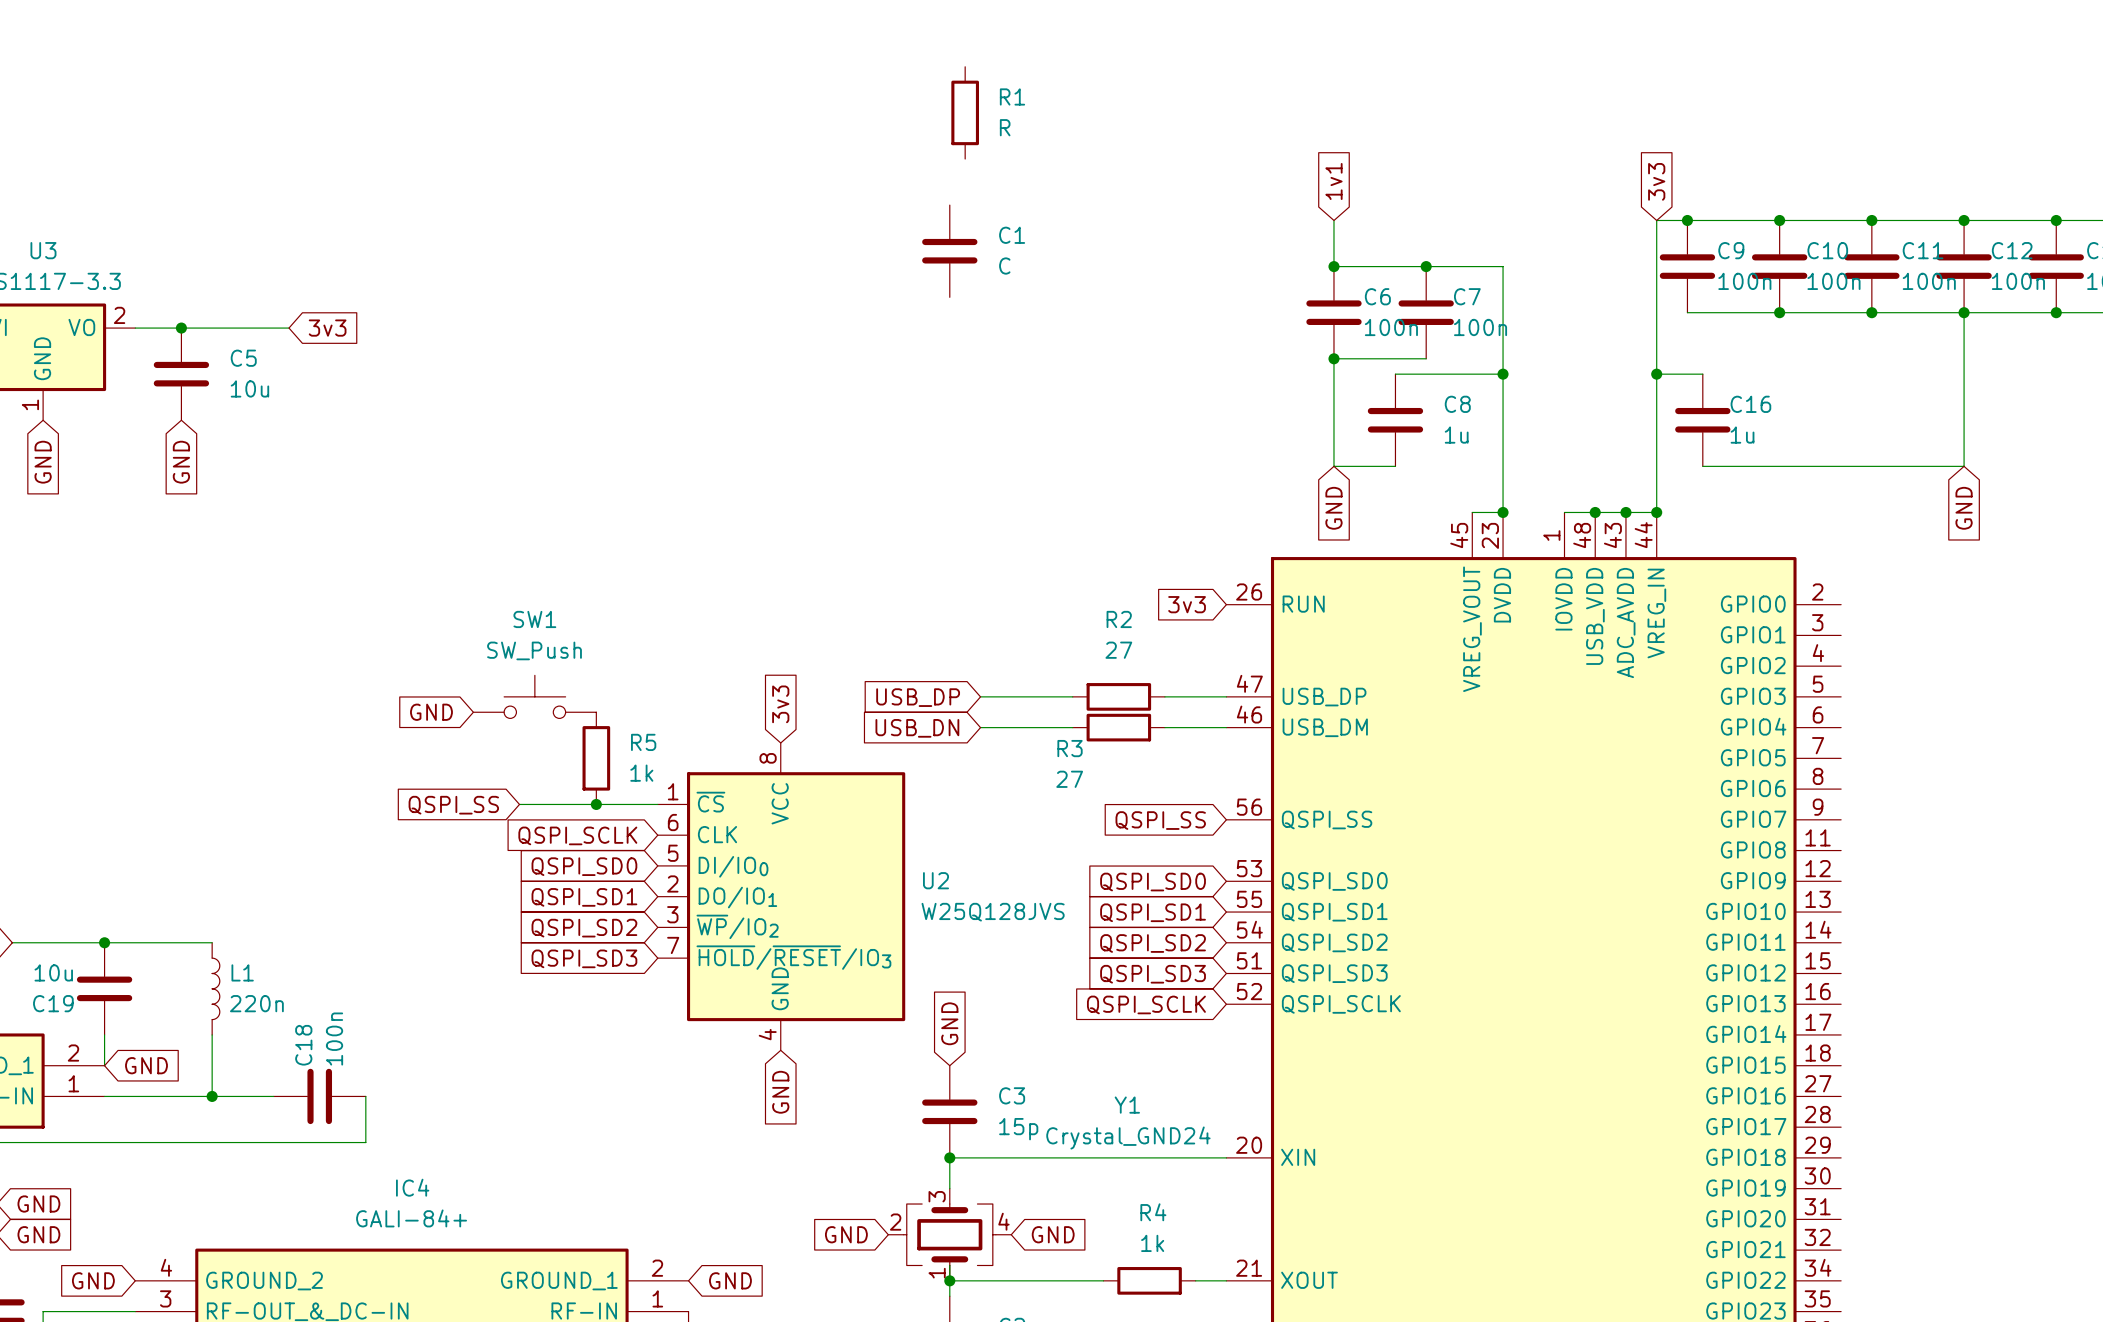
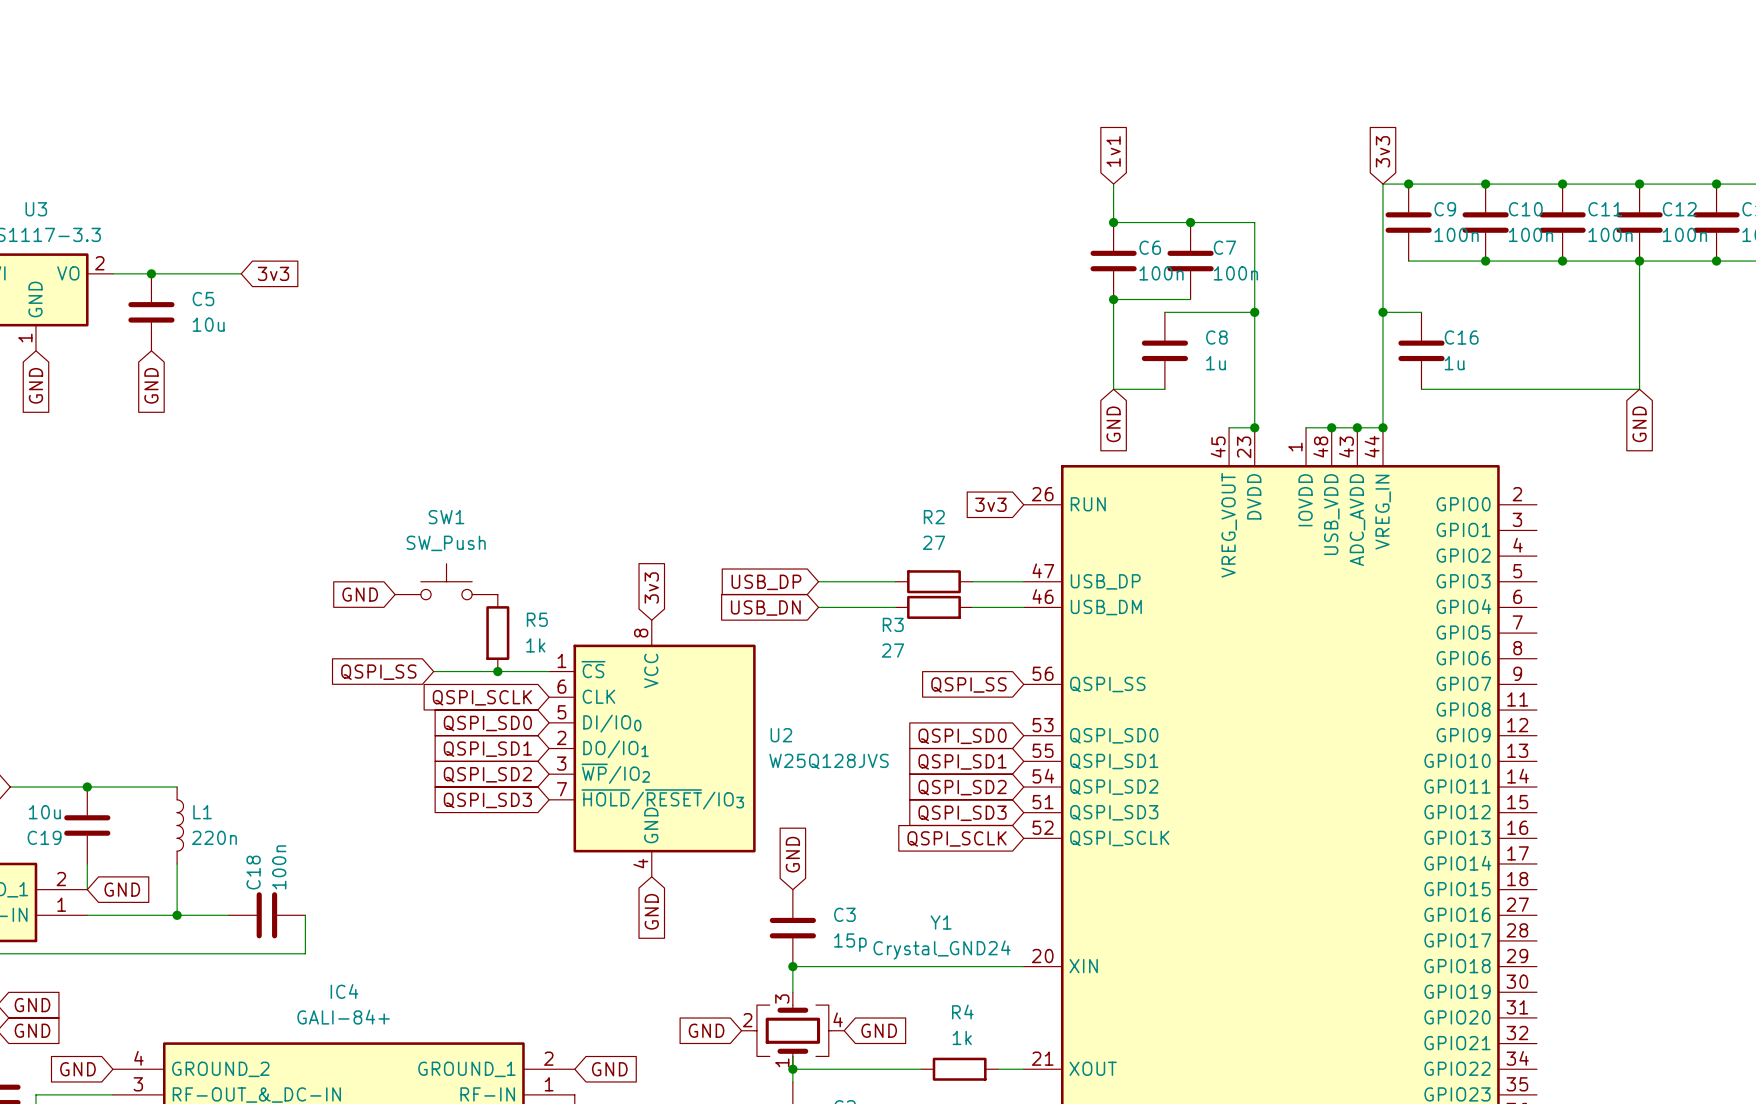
R1: R (965, 112) -> none
C1: C (949, 251) -> none

